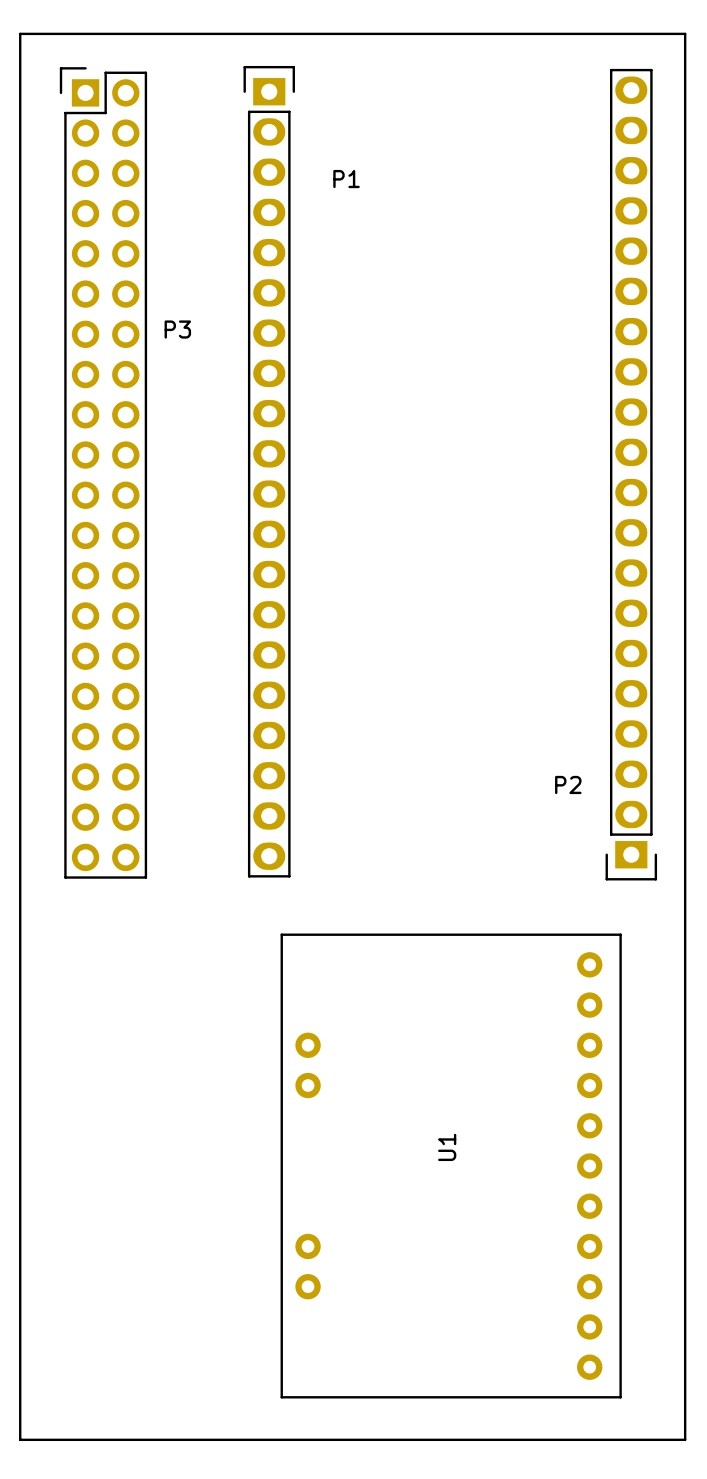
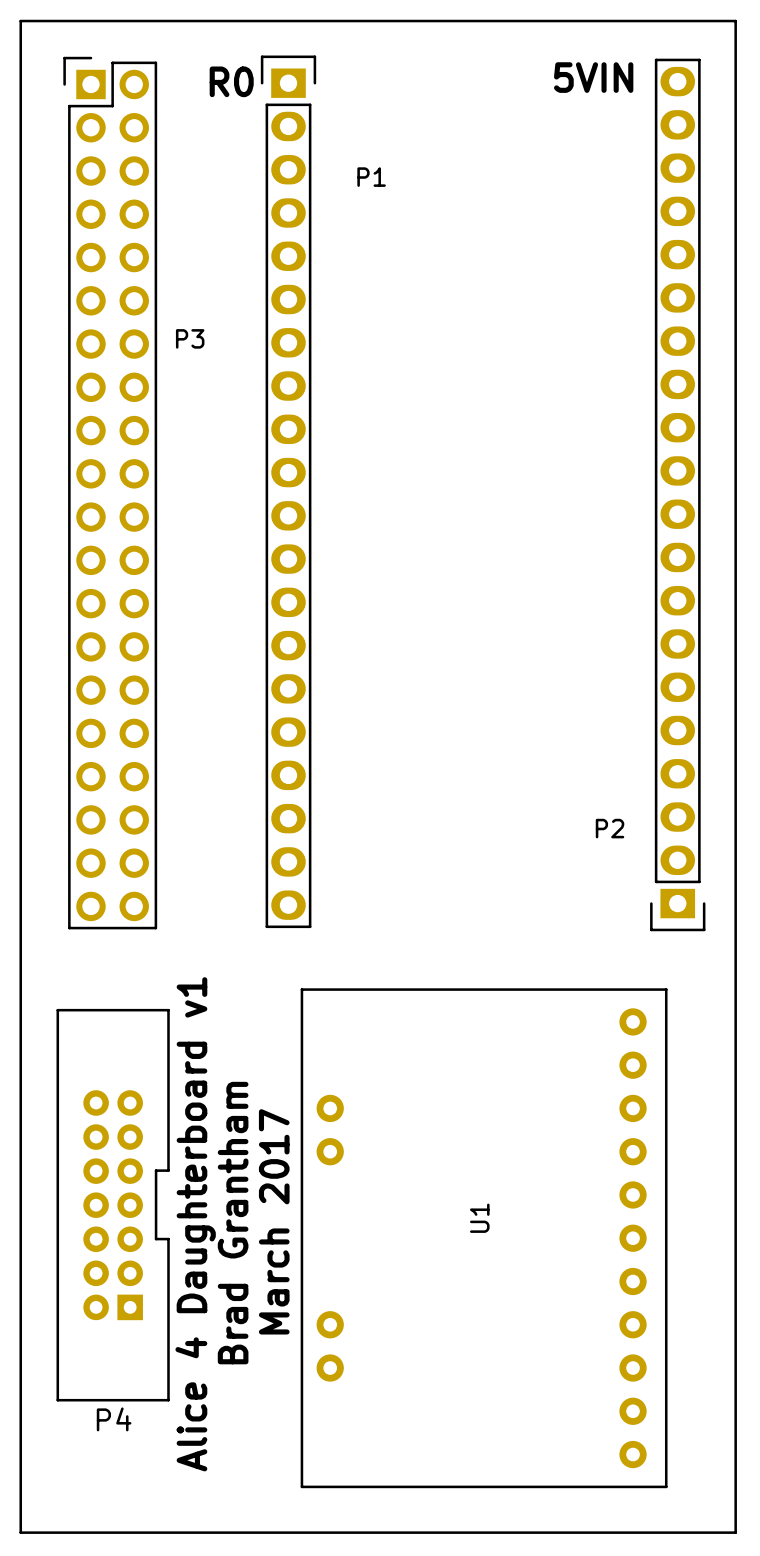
text: none -> 5VIN (593, 77)
text: none -> R0 (231, 81)
P4: none -> (113, 1205)
text: none -> March 2017 (274, 1221)
text: none -> Brad Grantham (233, 1223)
text: none -> Alice 4 Daughterboard v1 (195, 1224)

